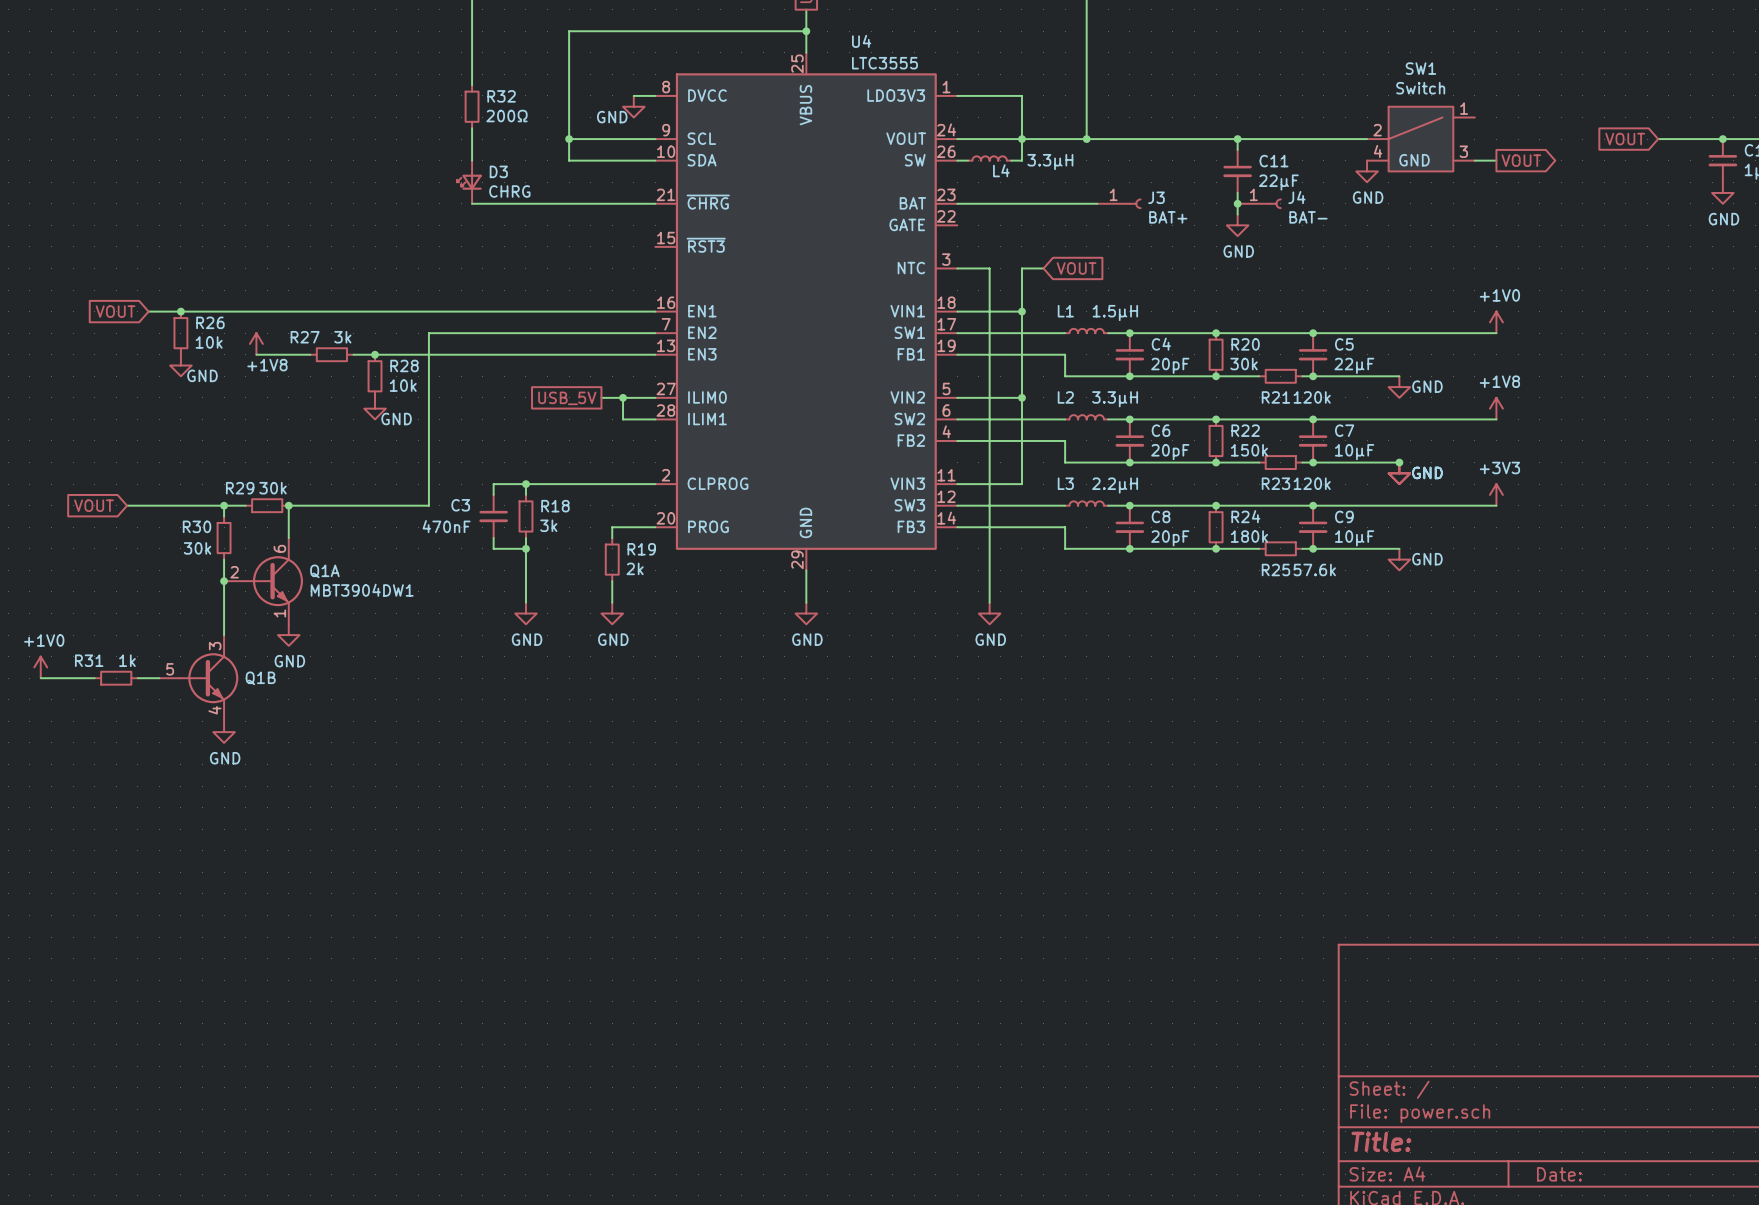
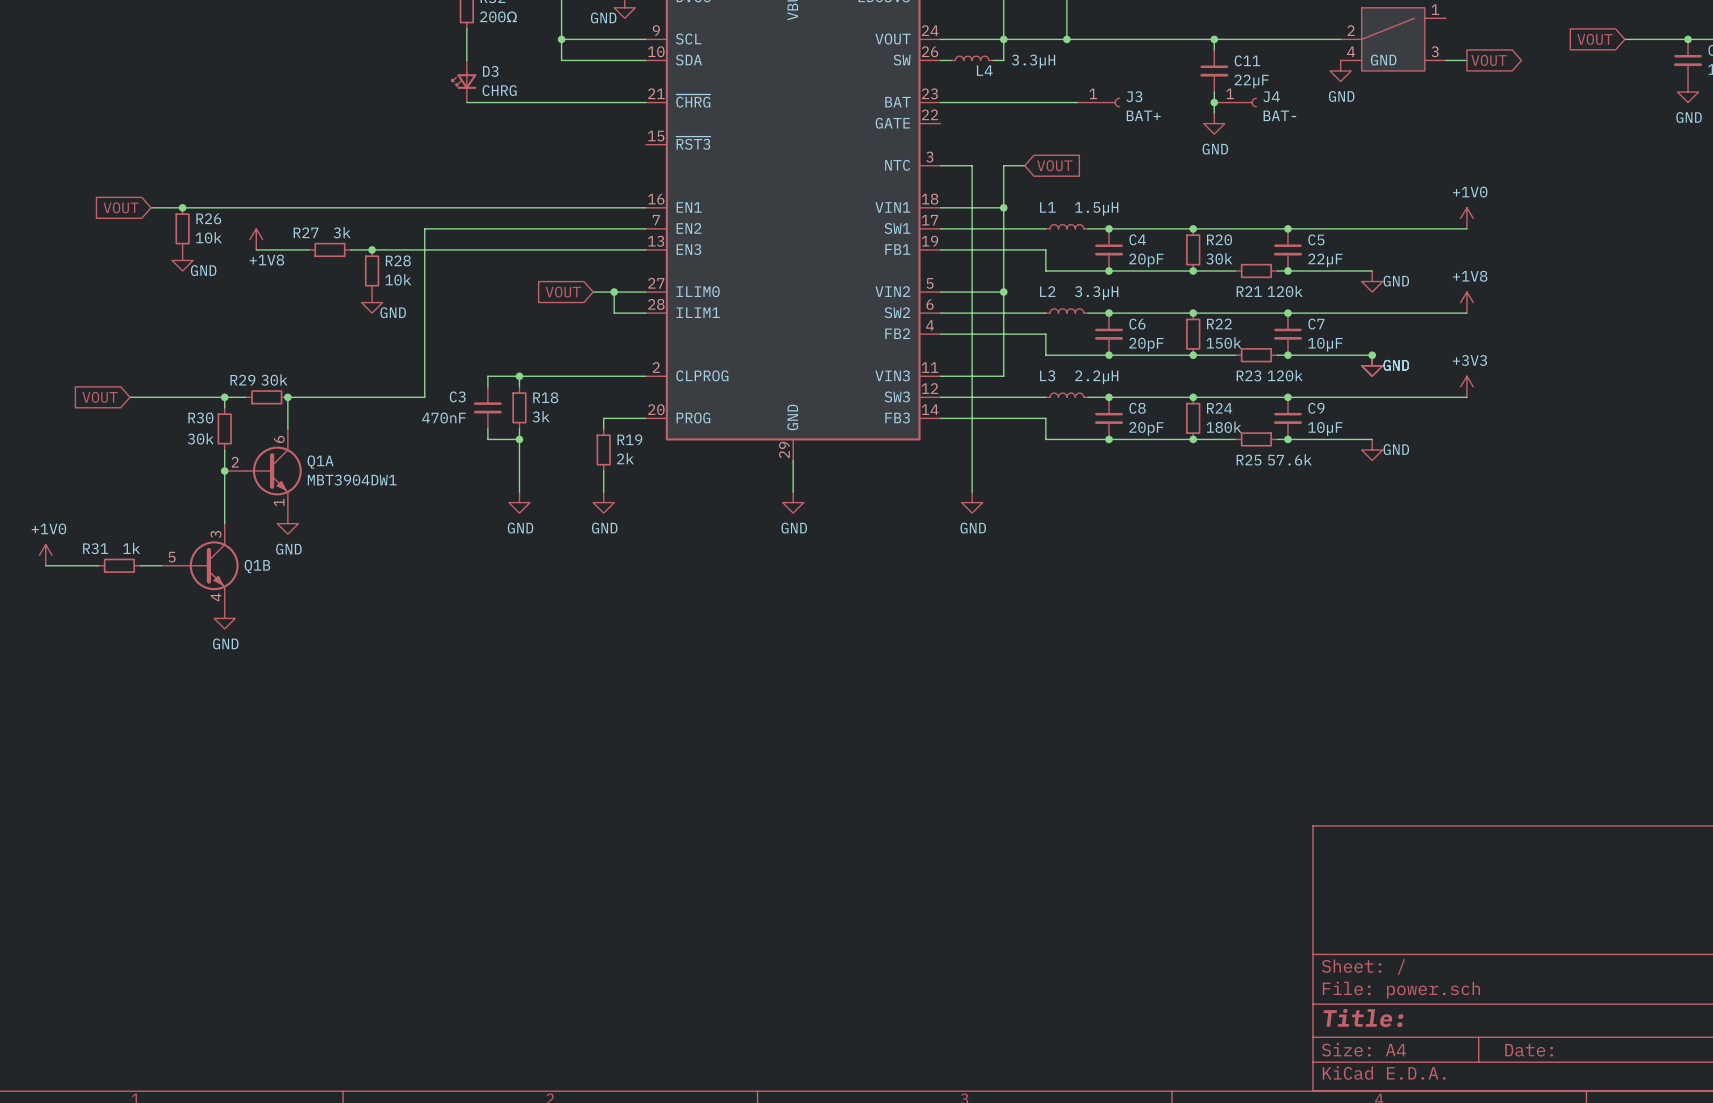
global label shape: passive (567, 398) -> input (563, 292)
global label: USB_5V (567, 398) -> VOUT (563, 292)

